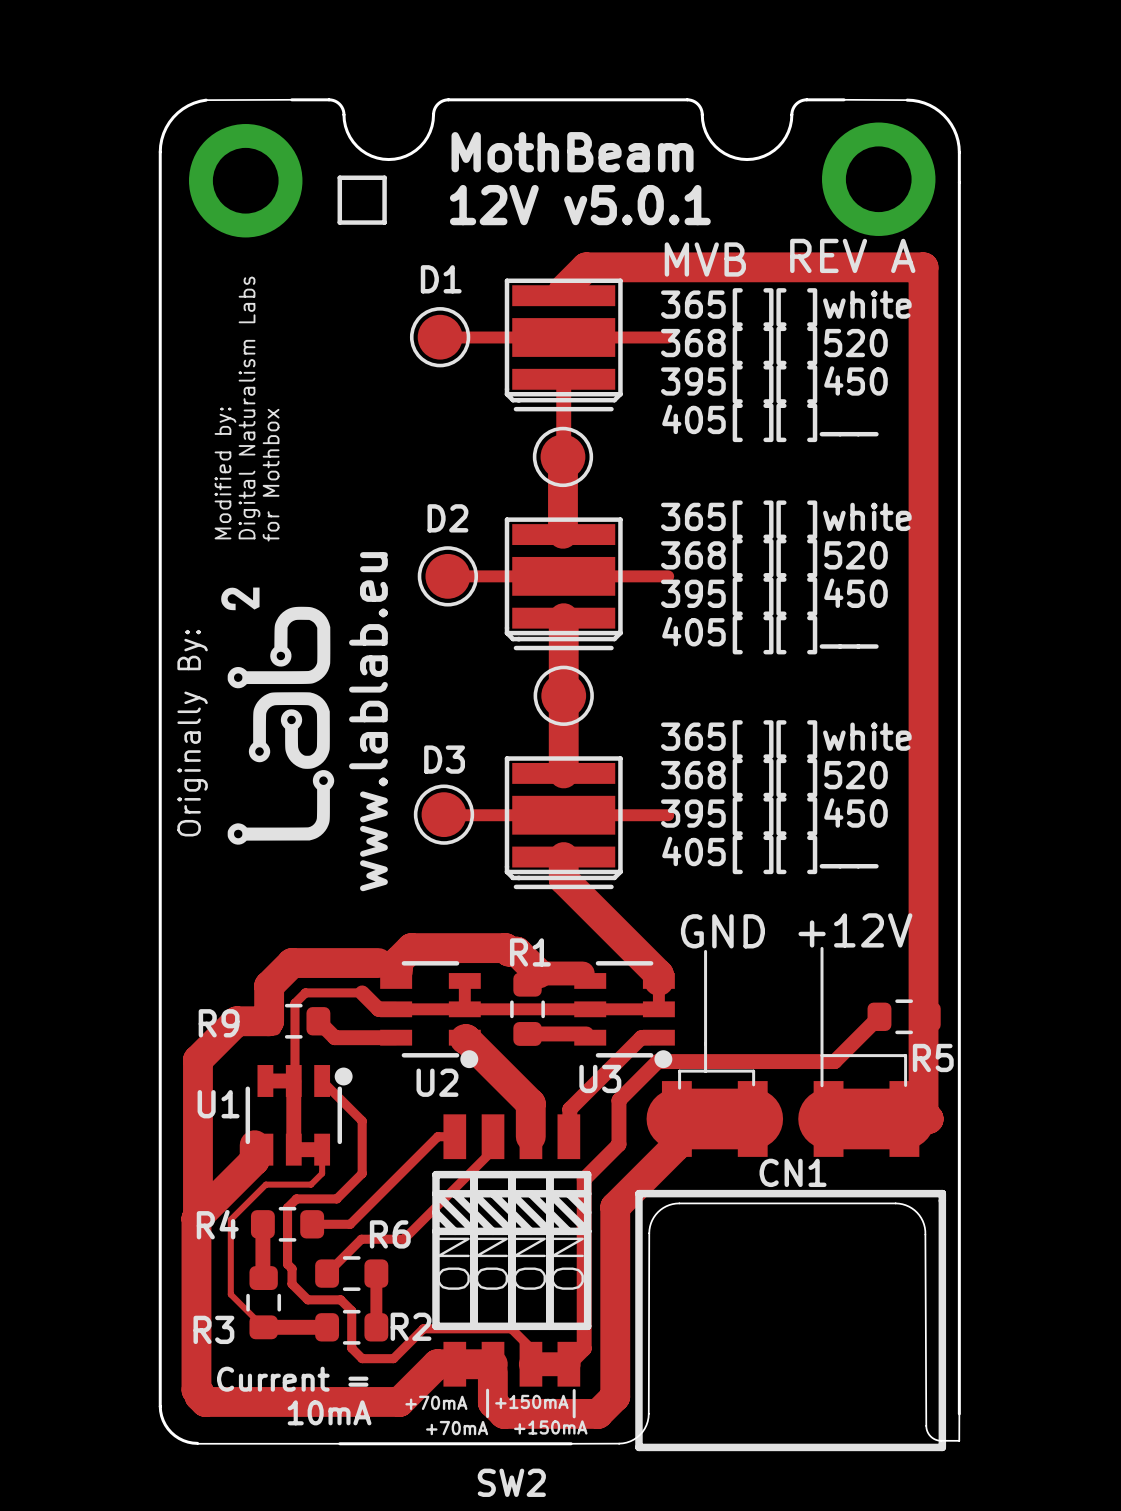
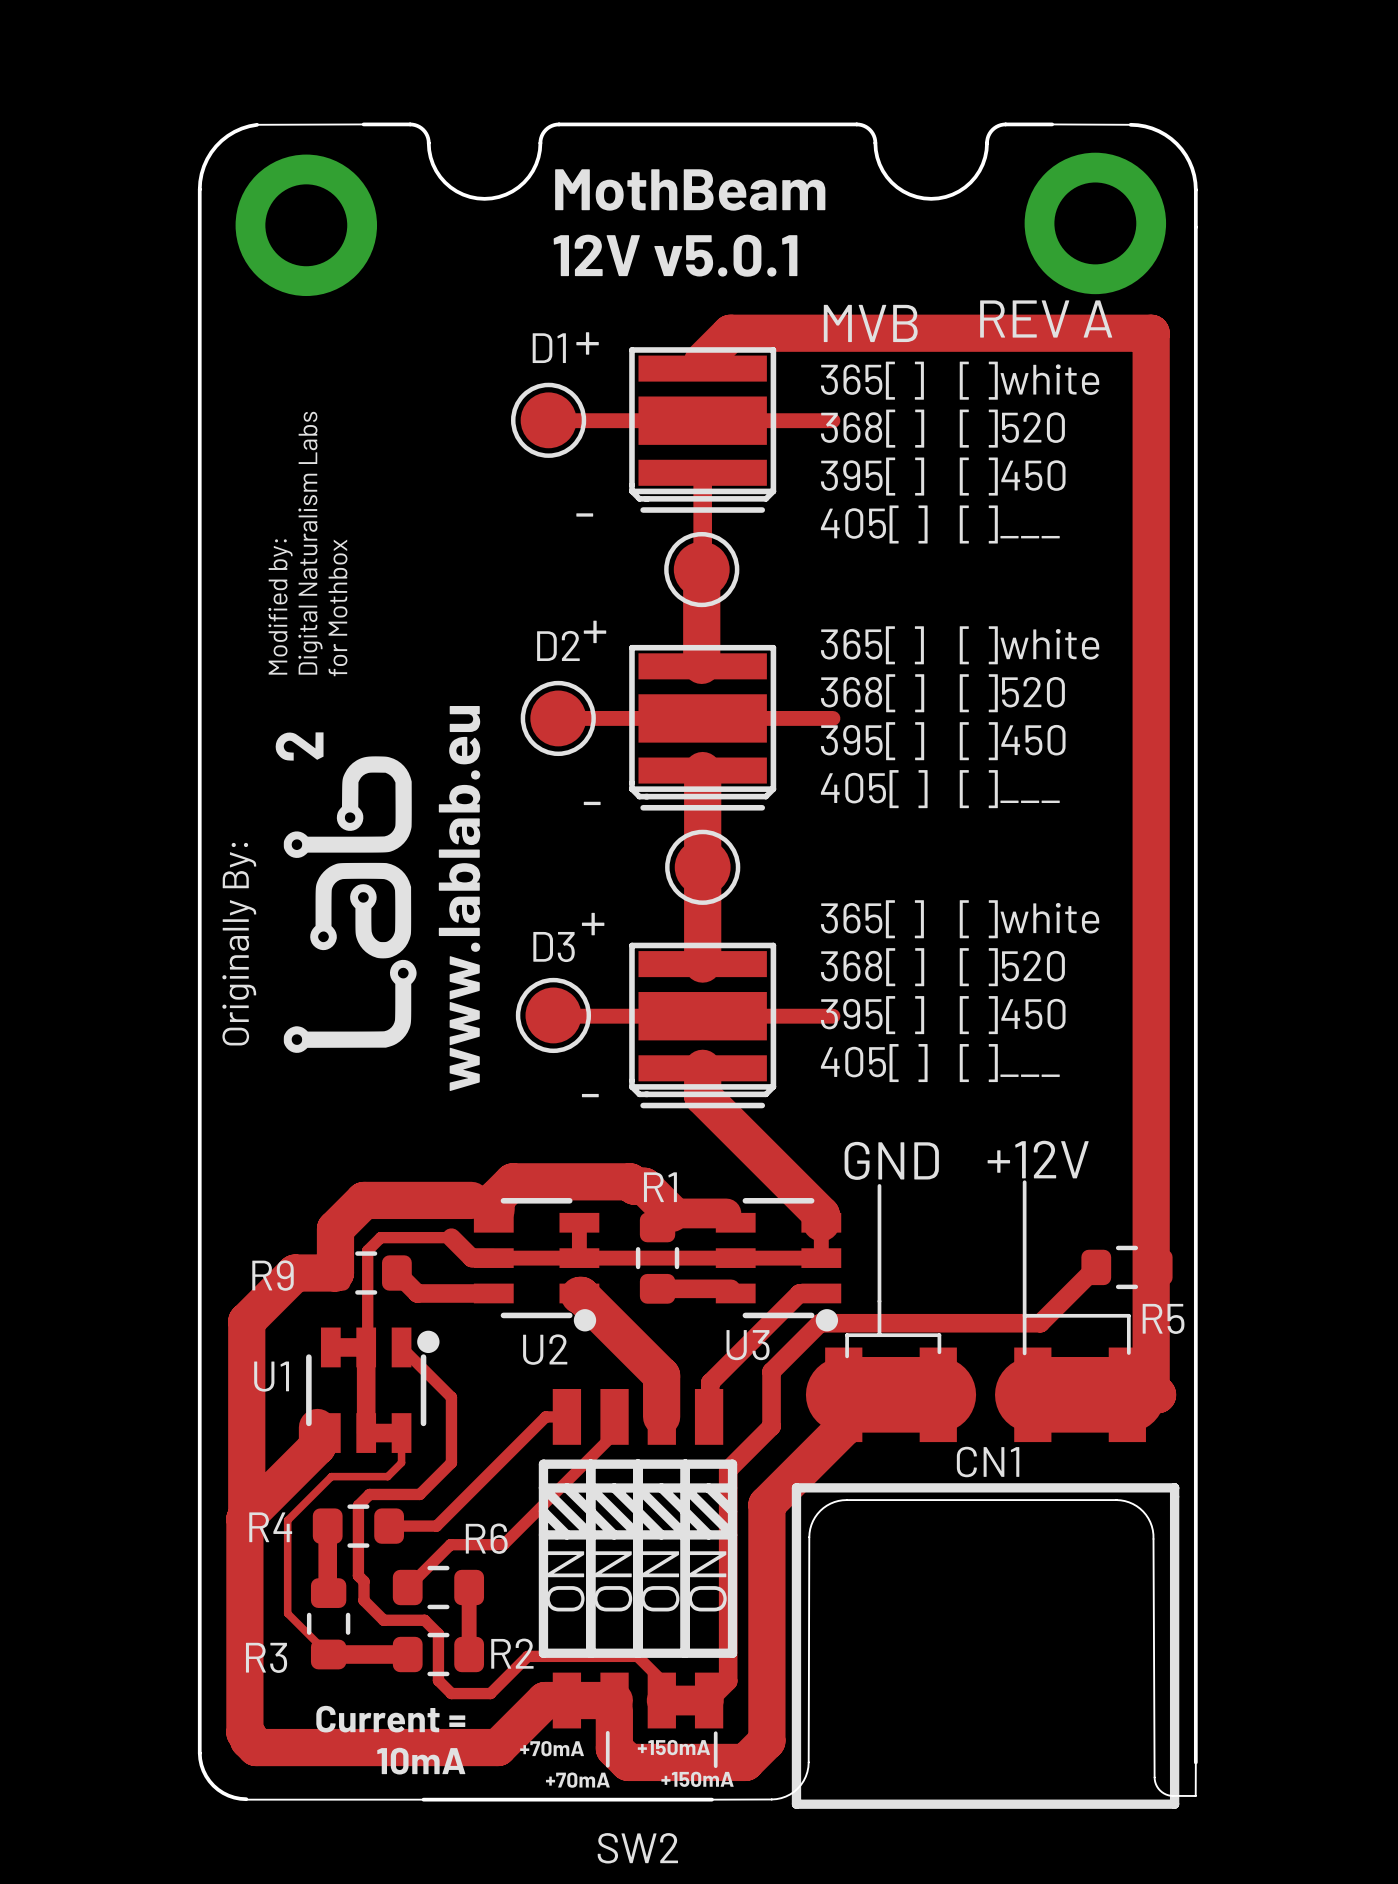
line: (339, 177) (384, 177) (384, 222) (339, 222) (339, 177) -> none
text: none -> + (587, 343)
text: none -> - (584, 514)
text: none -> + (595, 631)
text: none -> - (592, 803)
text: none -> + (593, 924)
text: none -> - (590, 1095)

